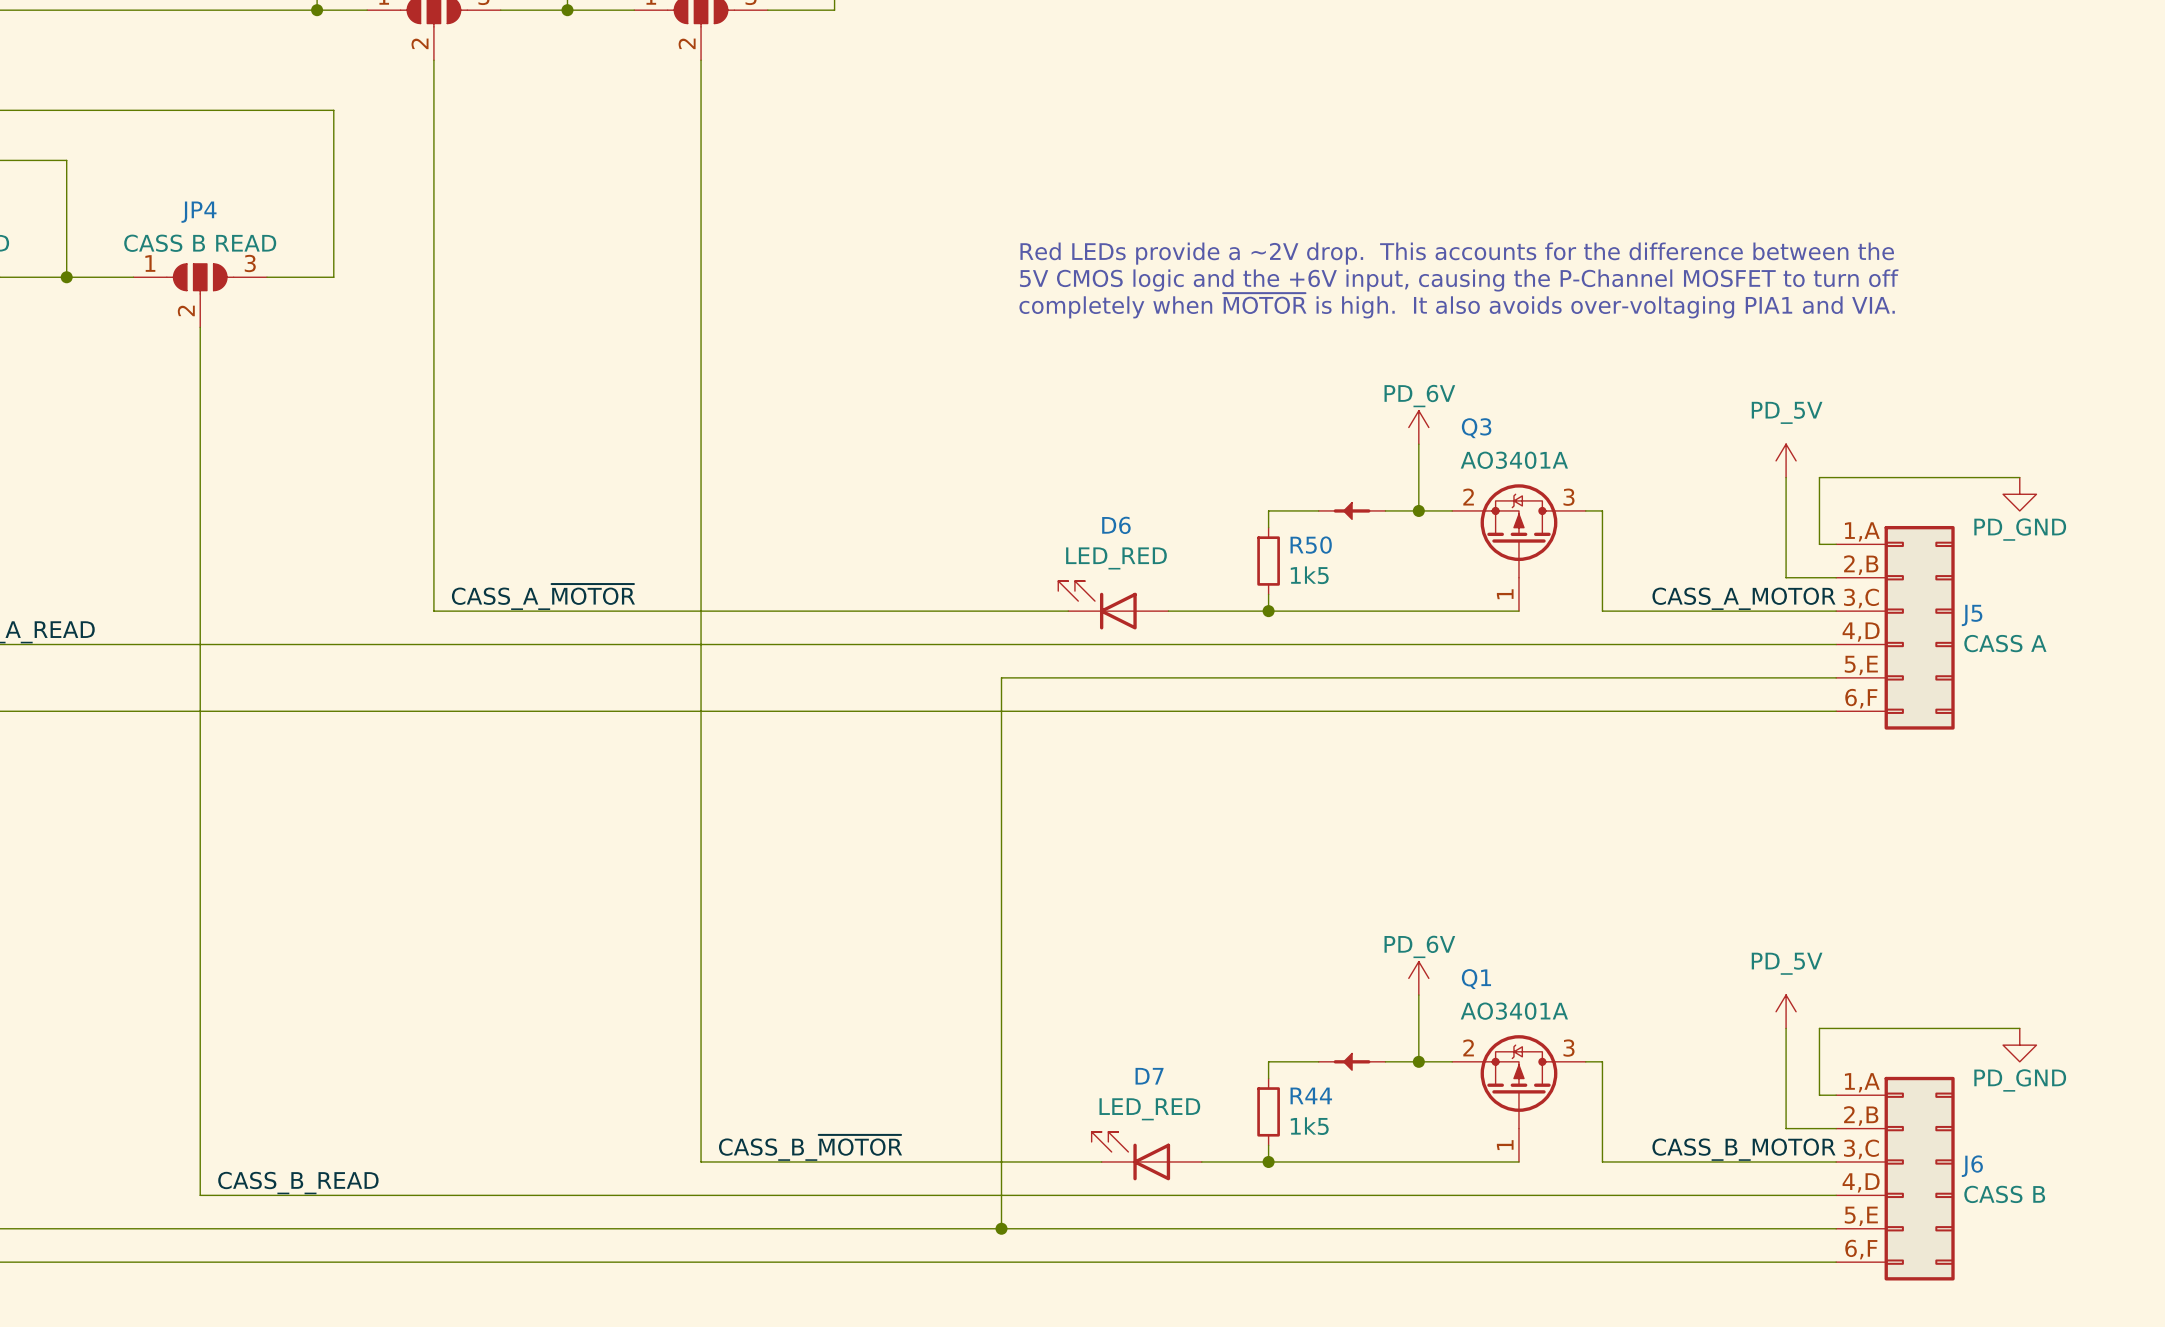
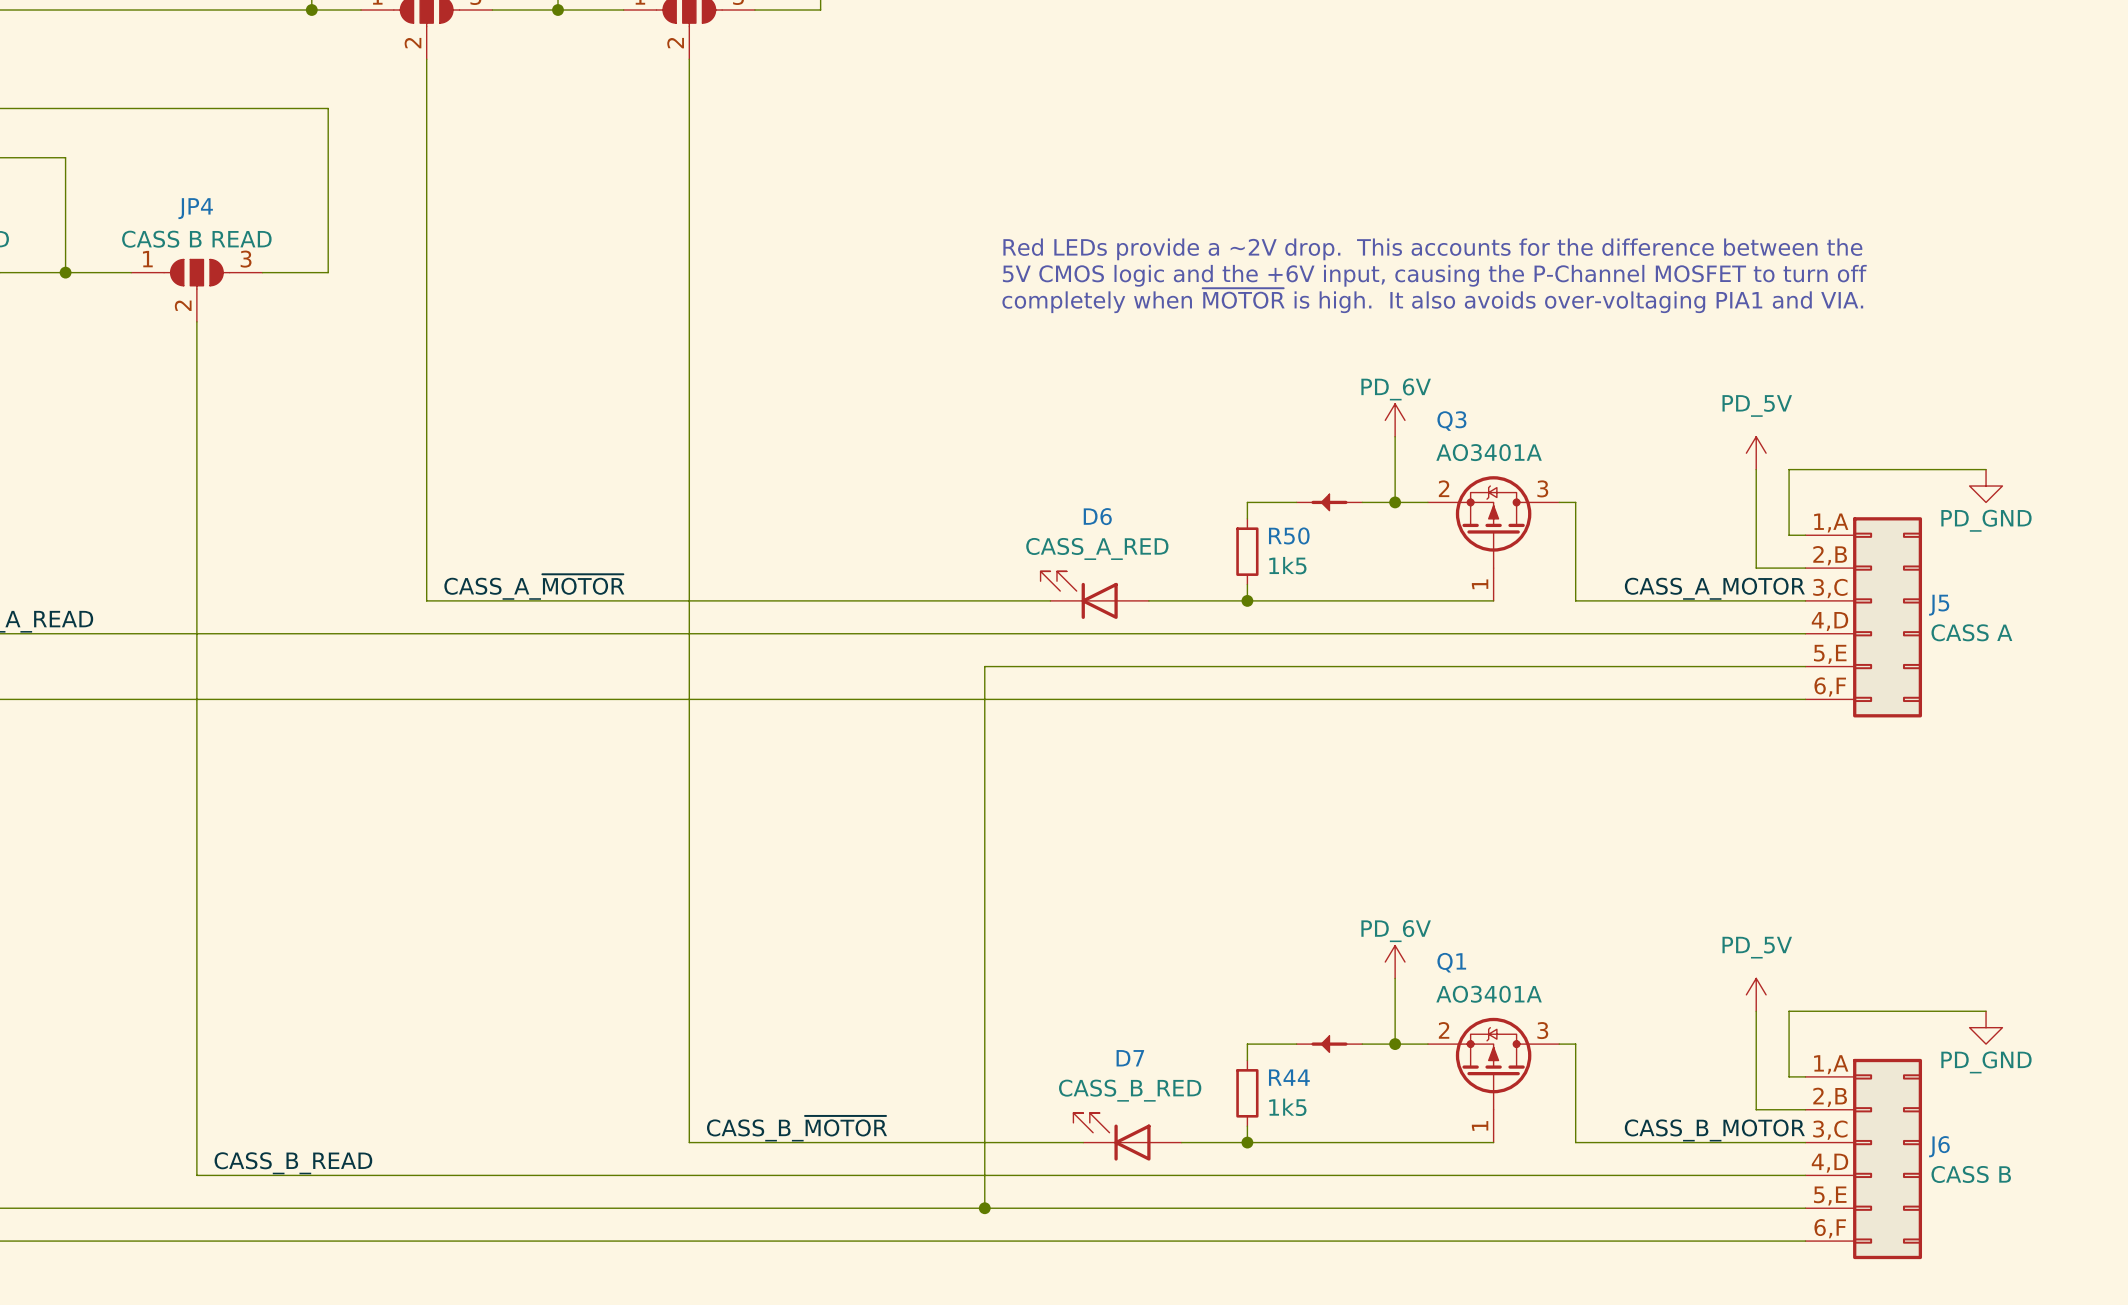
D6 value: LED_RED (1116, 558) -> CASS_A_RED (1097, 548)
D7 value: LED_RED (1149, 1109) -> CASS_B_RED (1130, 1090)

